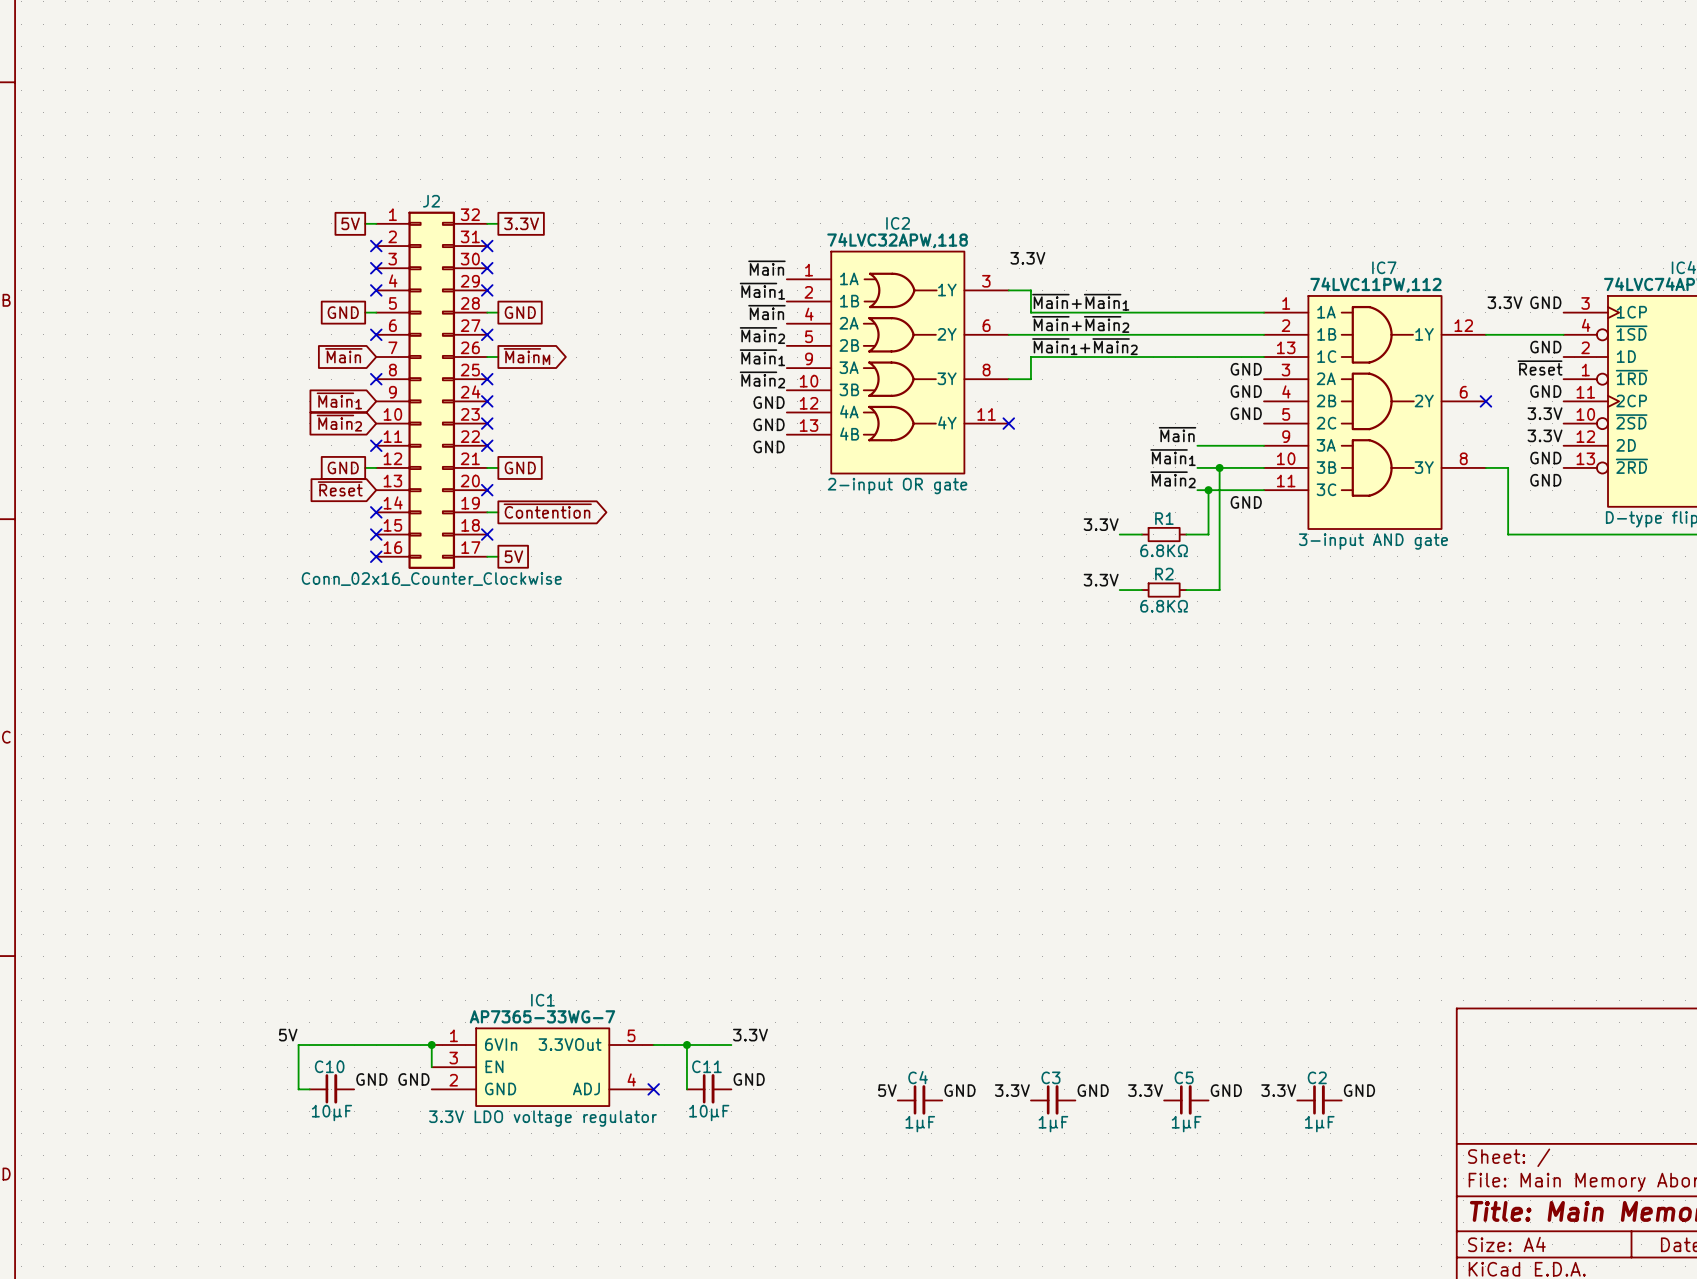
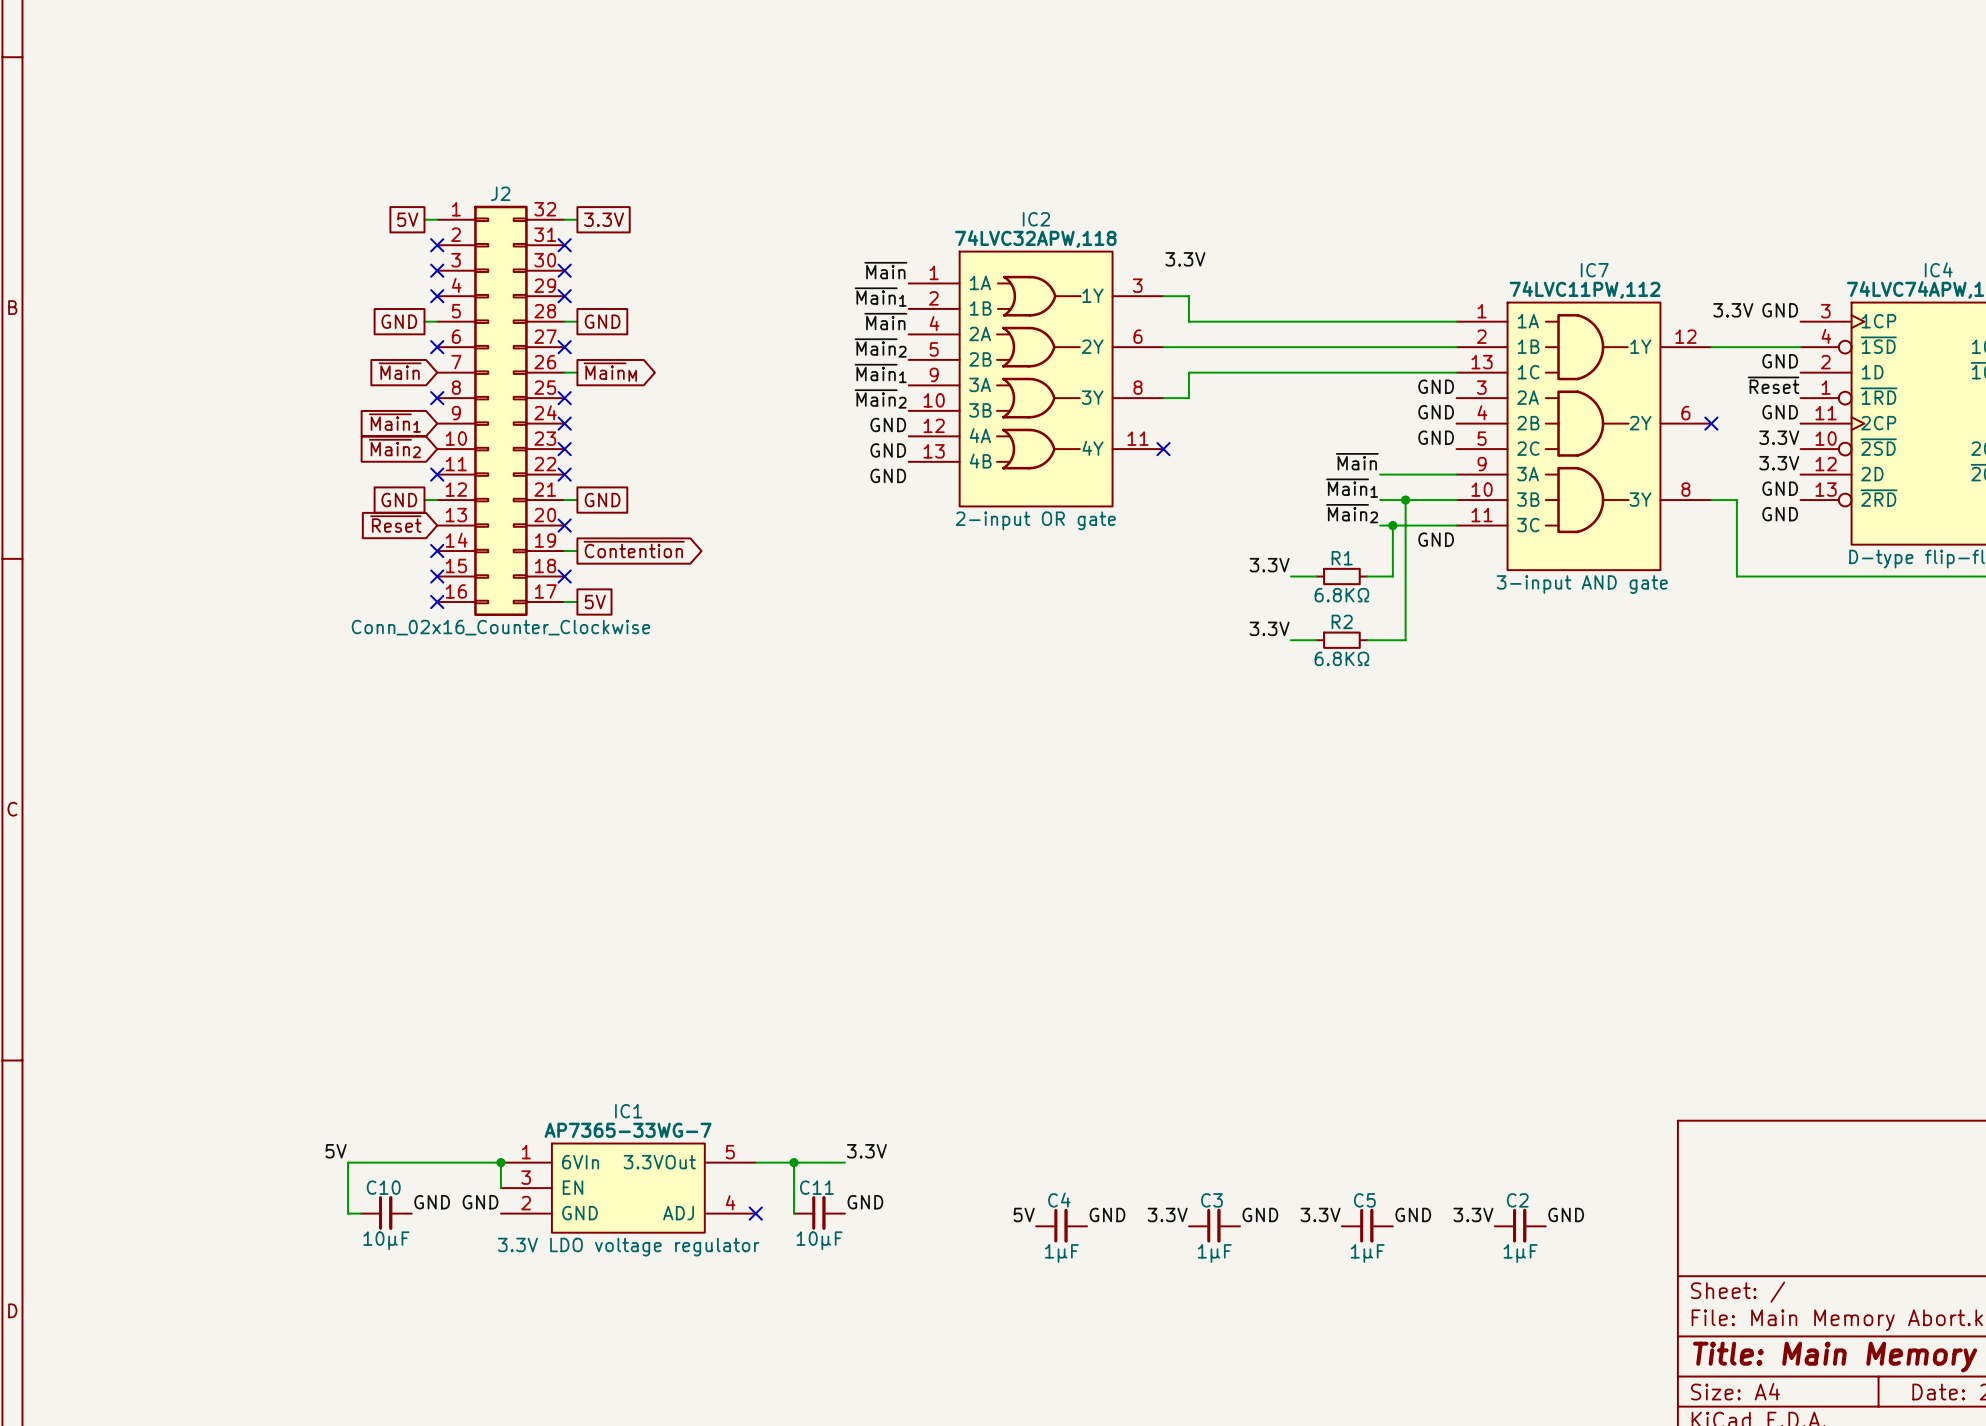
label: ~{Main}+~{Main}1 (1080, 302) -> none
label: ~{Main}+~{Main}2 (1080, 324) -> none
label: ~{Main}1+~{Main}2 (1084, 346) -> none

